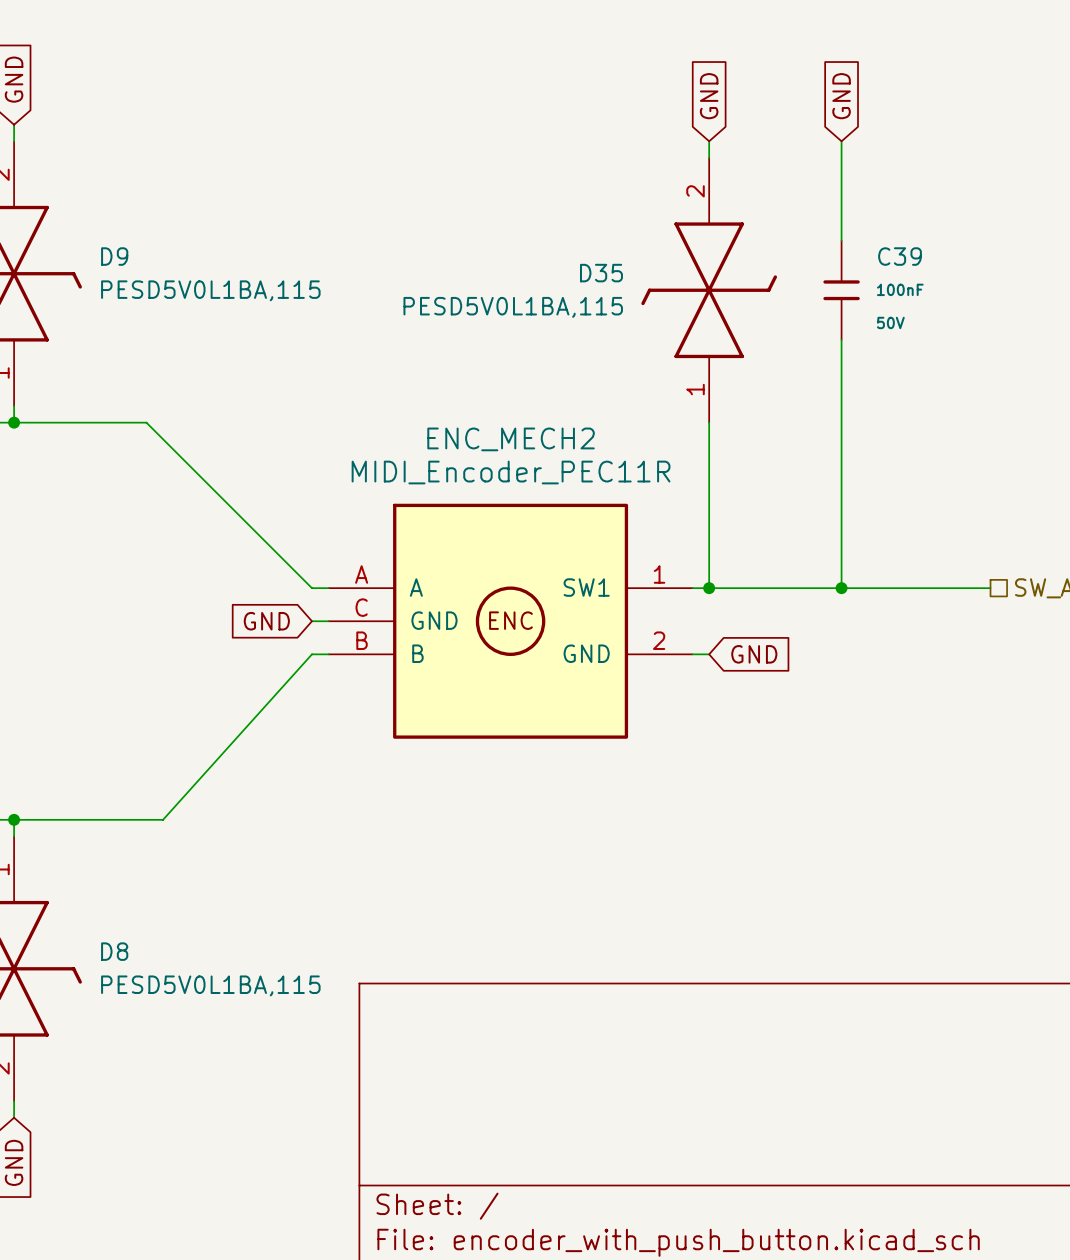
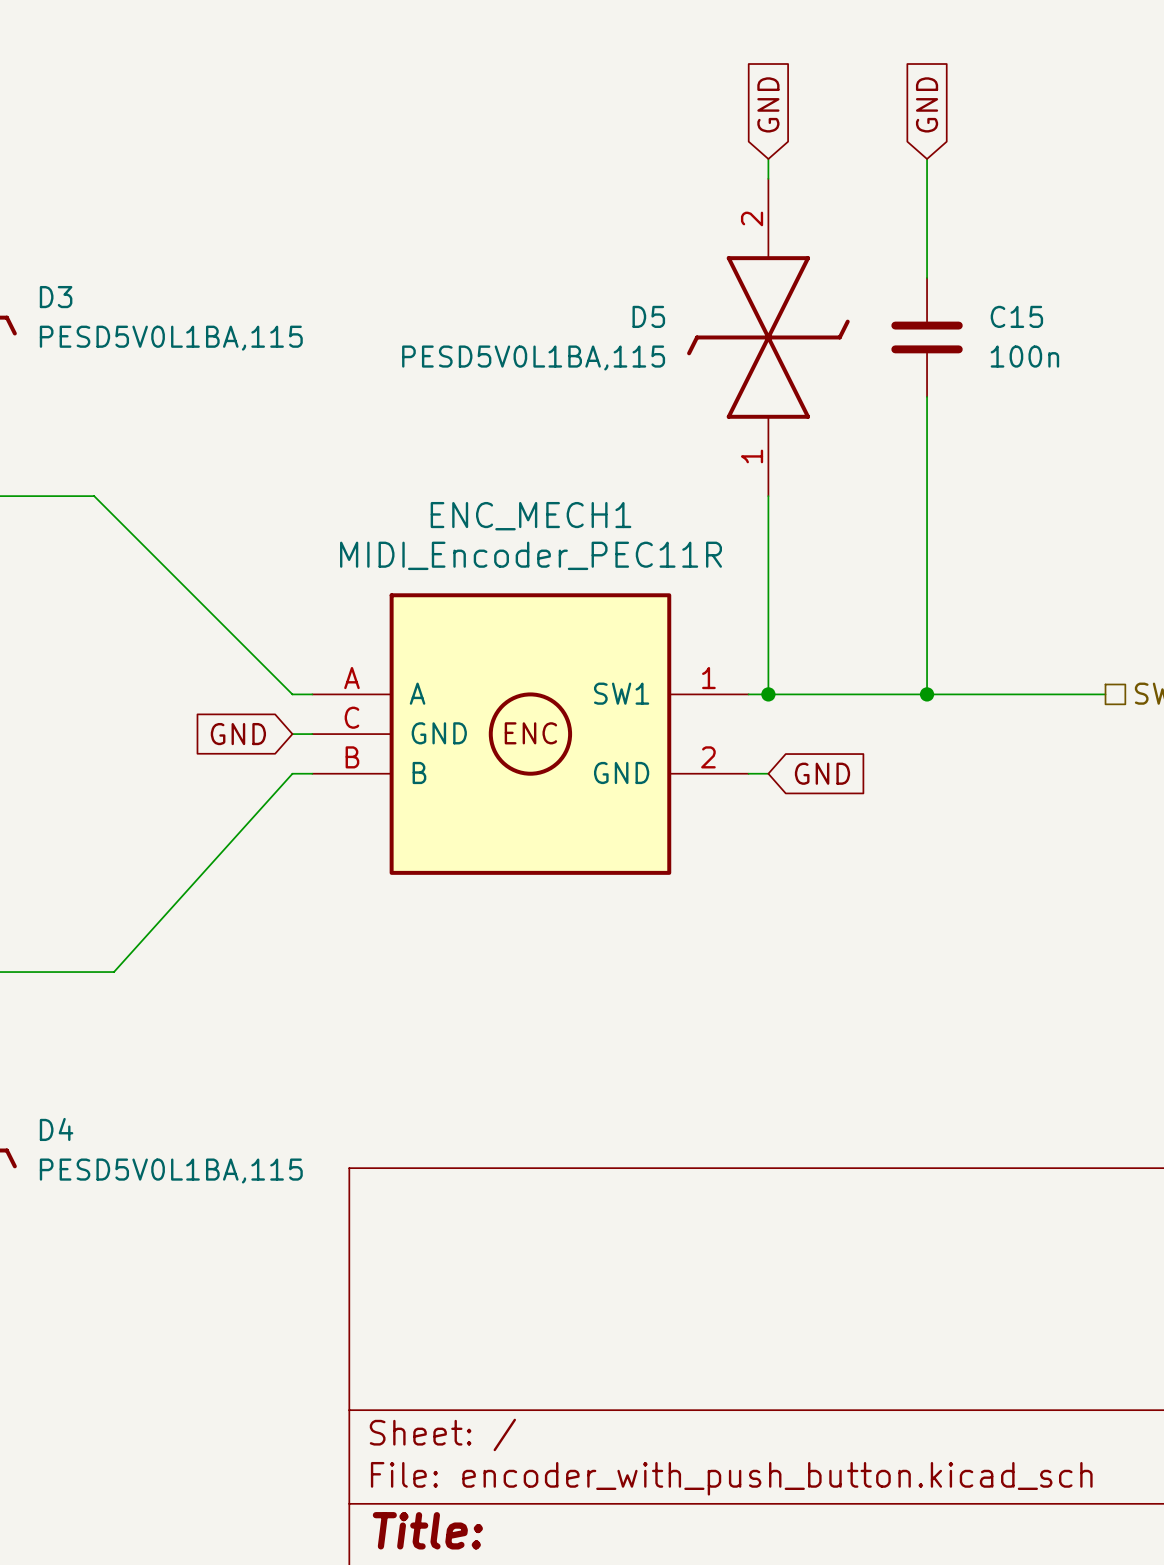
D9 name: D9 (114, 256) -> D3 (56, 297)
D35 name: D35 (601, 273) -> D5 (648, 316)
C39: 100nF (841, 290) -> none
C15: none -> 100n (927, 337)
ENC_MECH2 name: ENC_MECH2 (511, 439) -> ENC_MECH1 (531, 516)
D8 name: D8 (114, 951) -> D4 (56, 1129)

